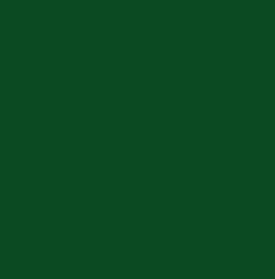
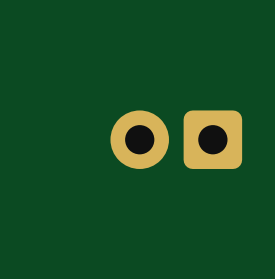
part: none -> (176, 139)

